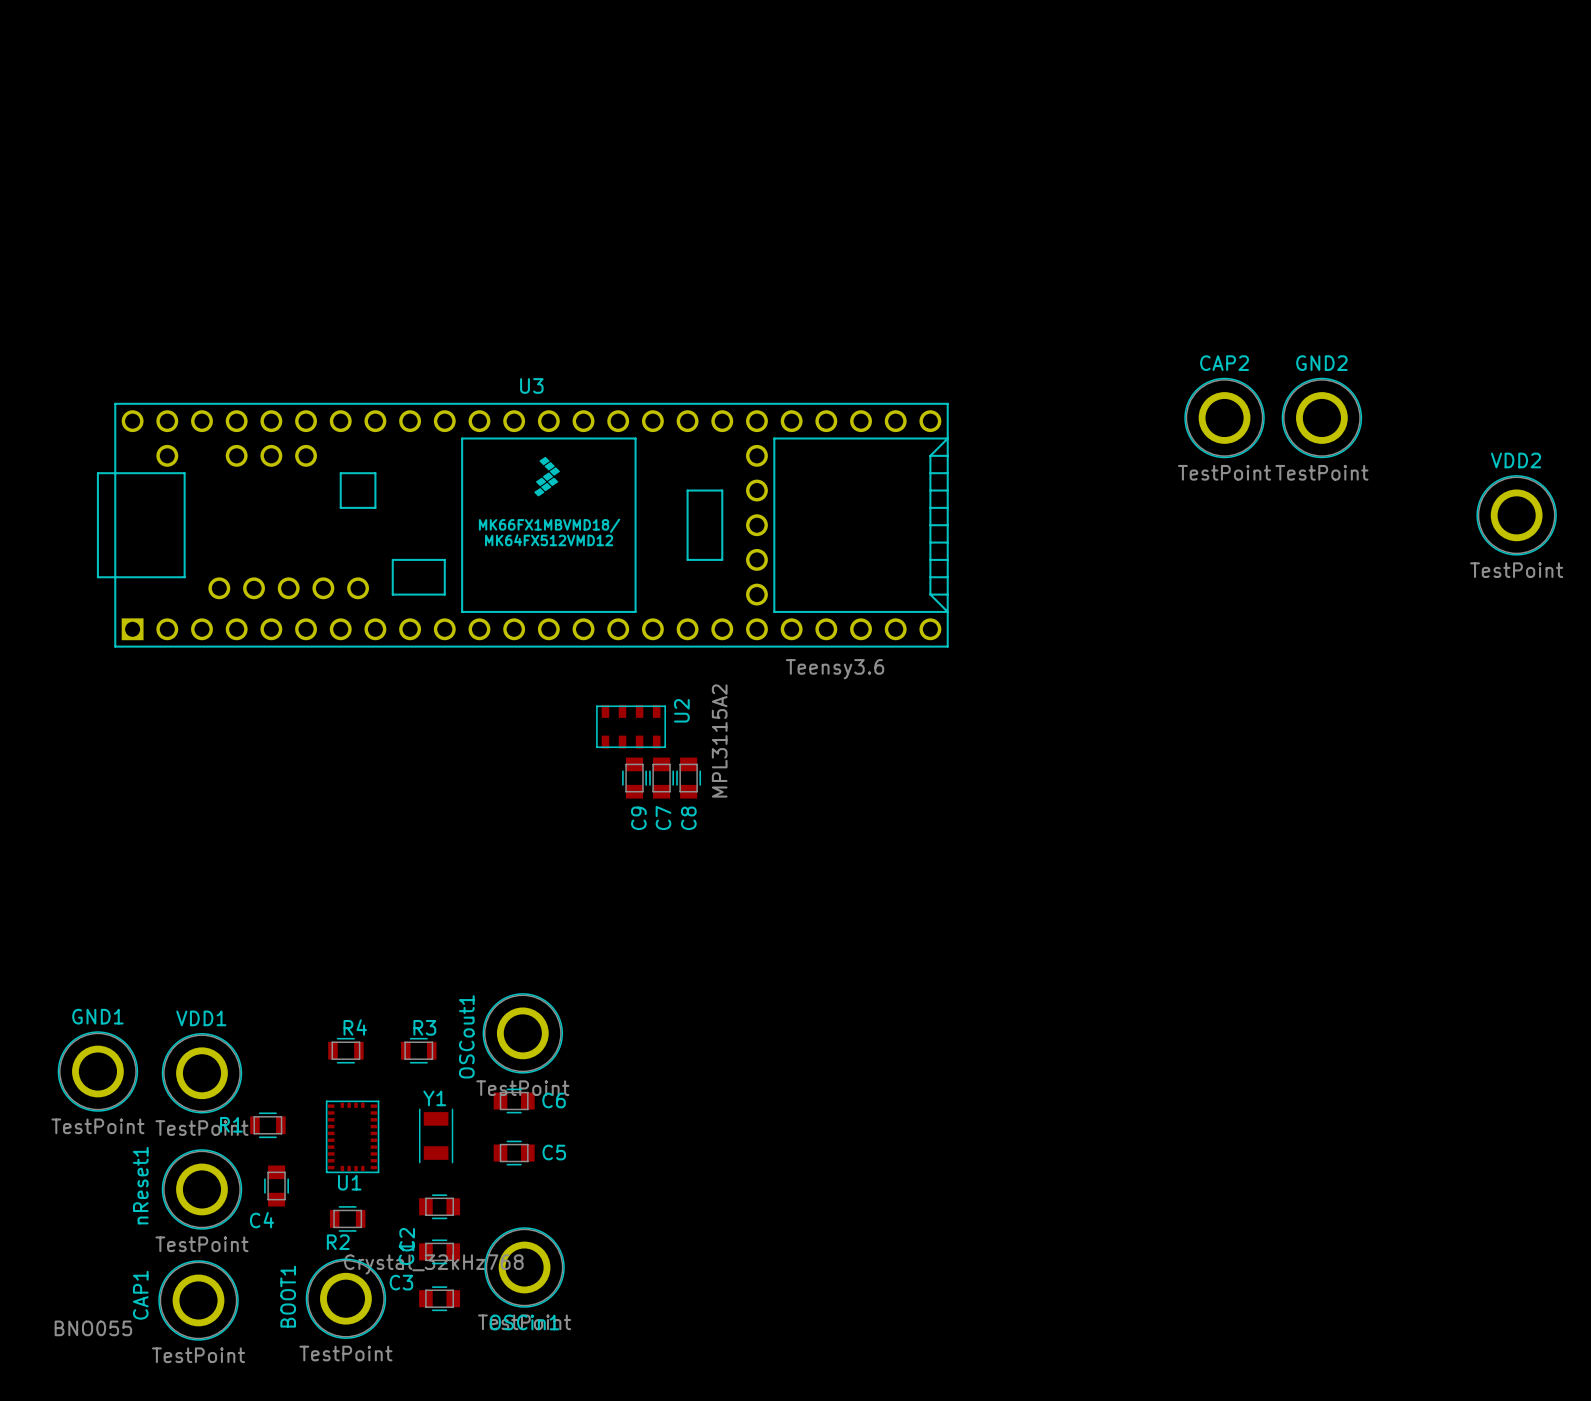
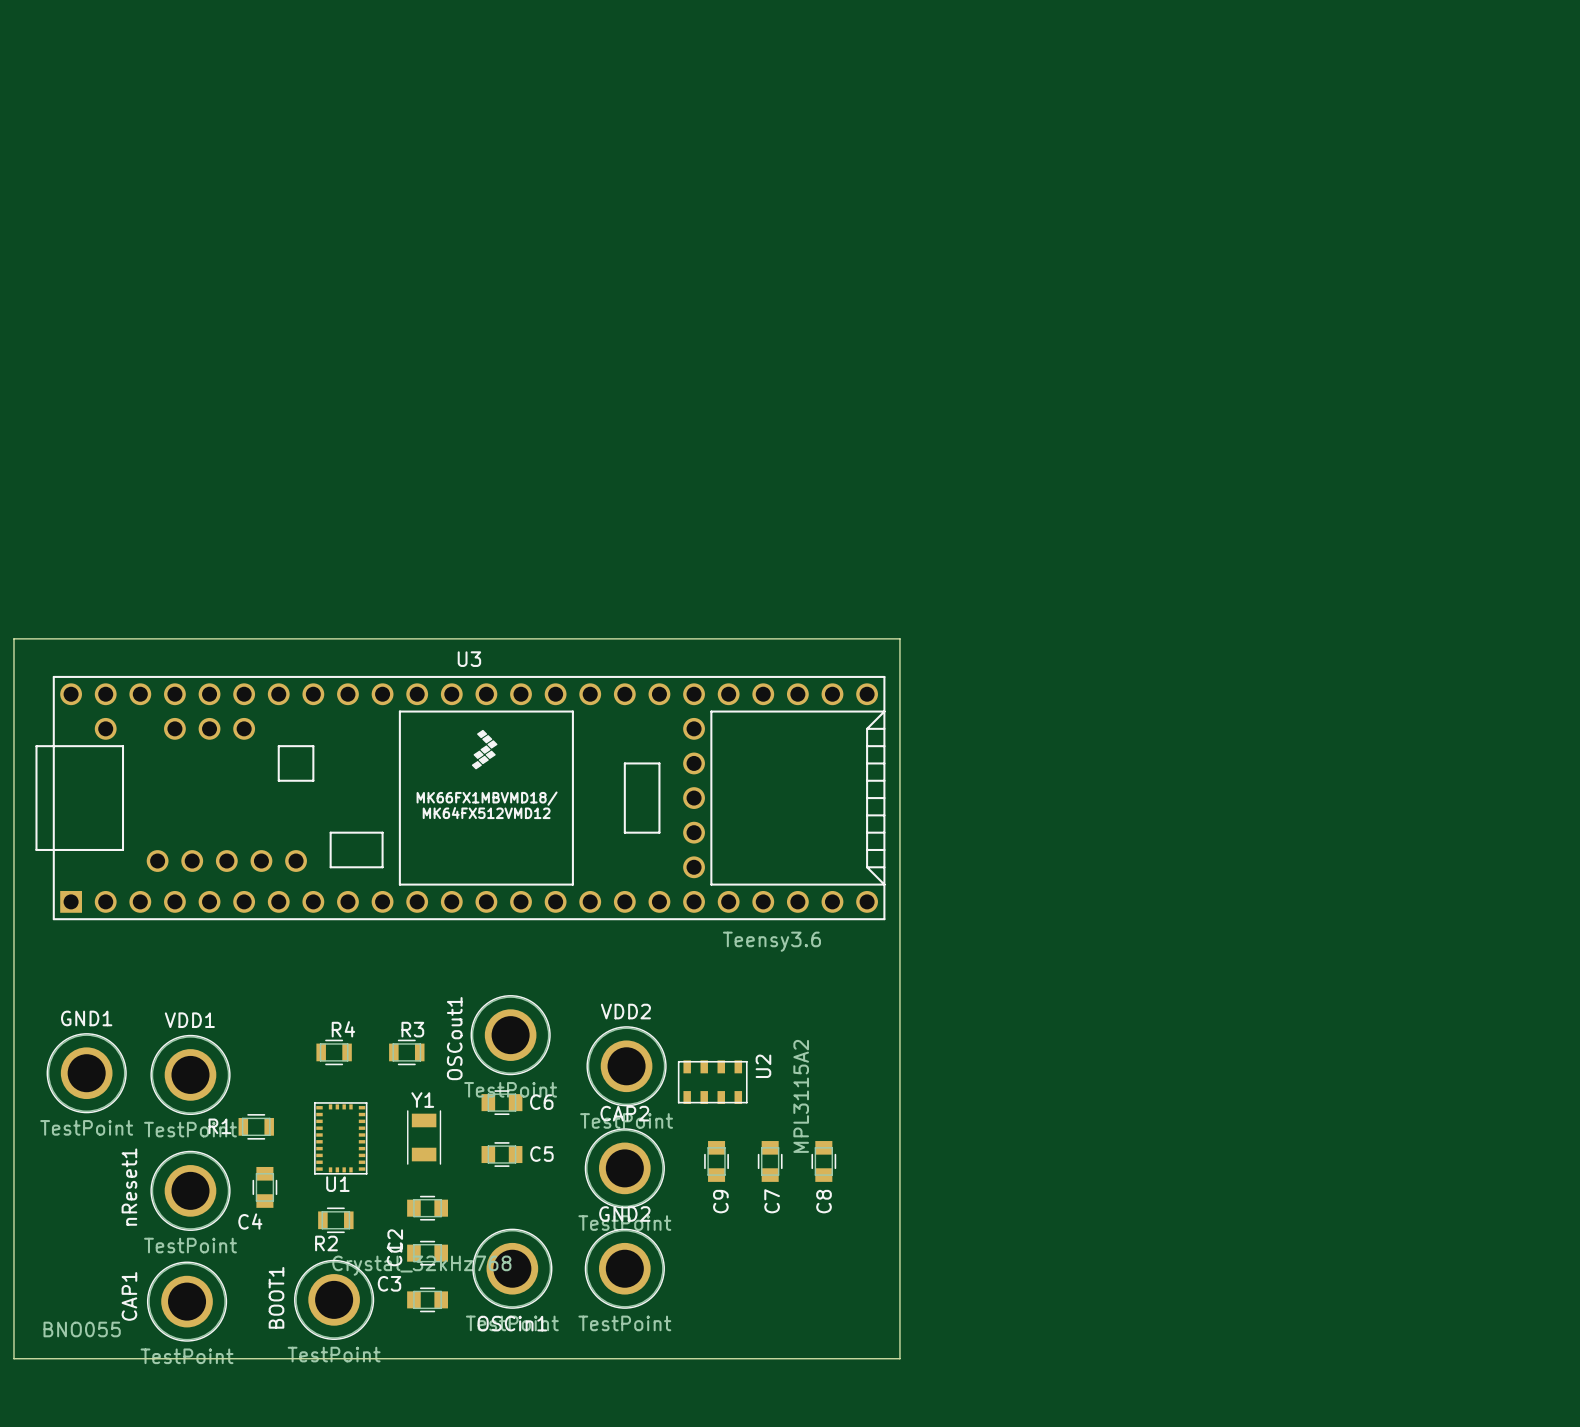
CAP2 position: (1224, 417) -> (624, 1168)
GND2 position: (1321, 417) -> (624, 1268)
VDD2 position: (1516, 515) -> (626, 1066)
U3 position: (522, 525) -> (460, 798)
board edge: none -> (13, 638) (899, 638) (899, 1358) (13, 1358) (13, 638)
U2 position: (631, 726) -> (712, 1082)
C9 position: (634, 778) -> (716, 1161)
C7 position: (661, 778) -> (770, 1161)
C8 position: (688, 778) -> (823, 1161)

